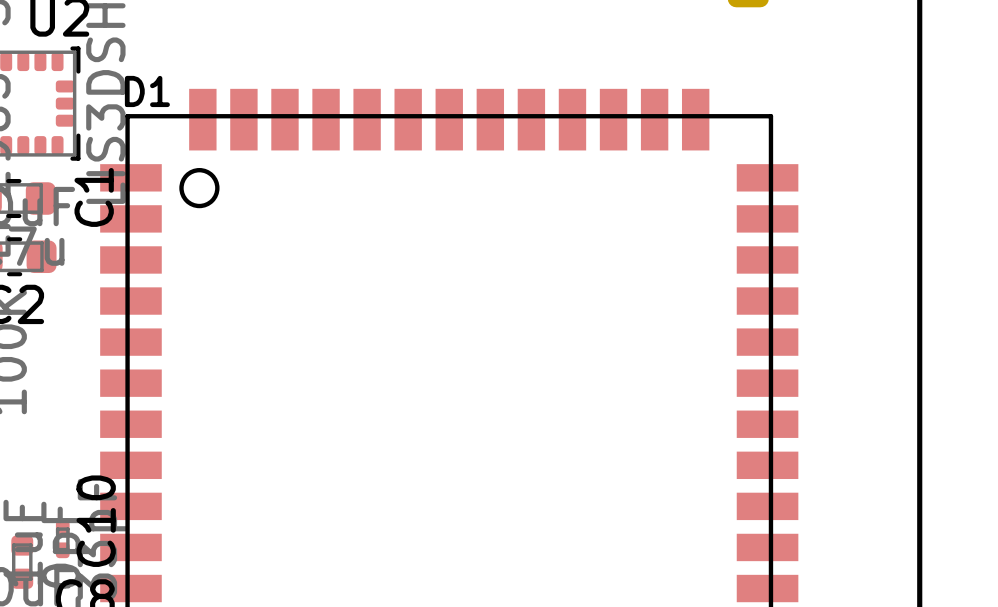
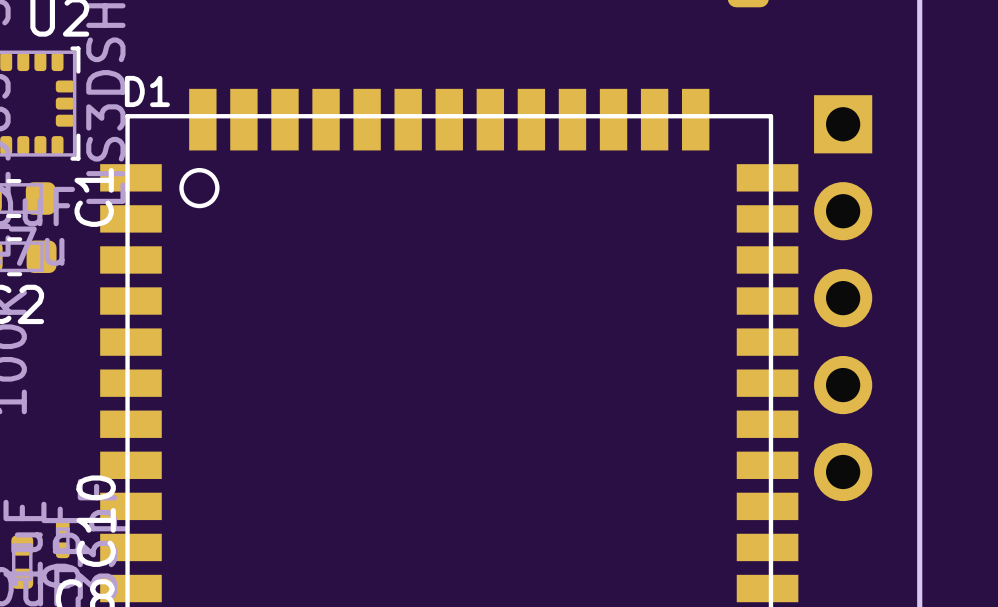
part: none -> (843, 298)

